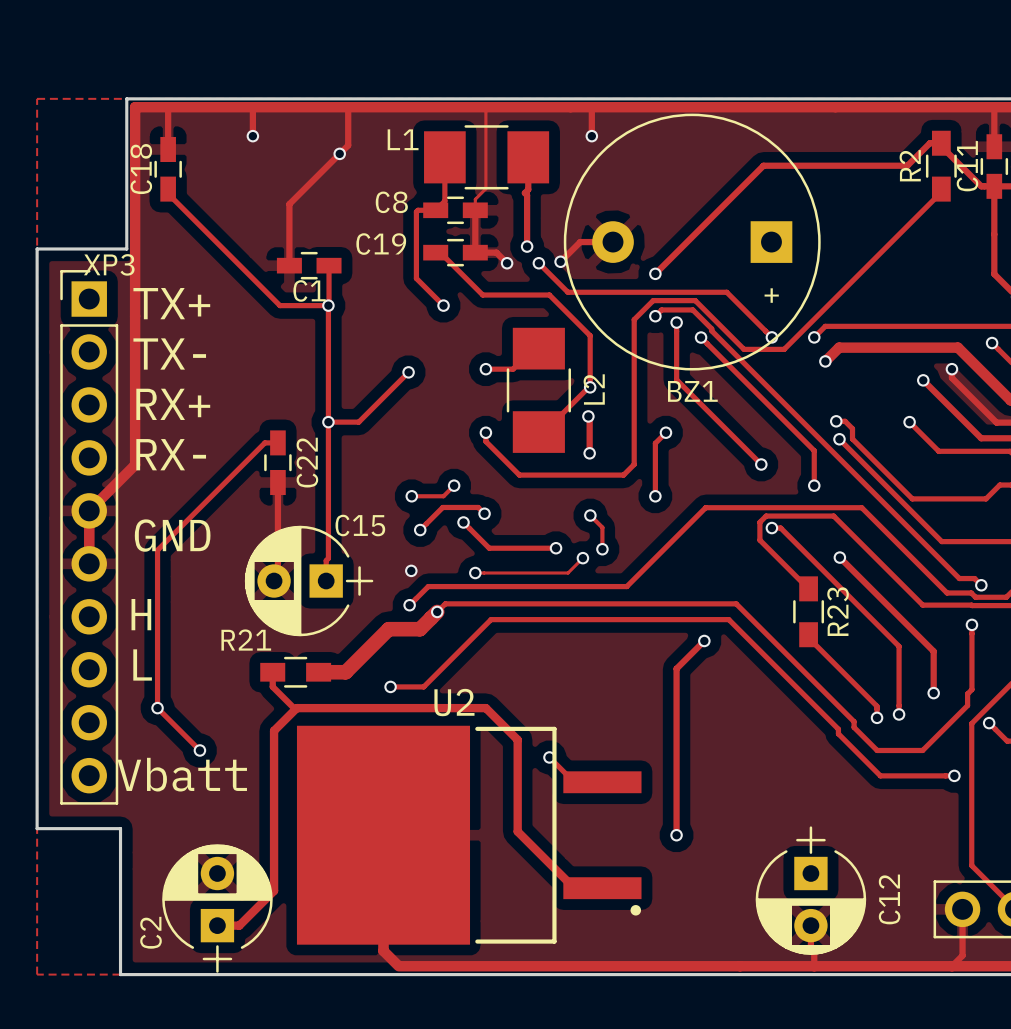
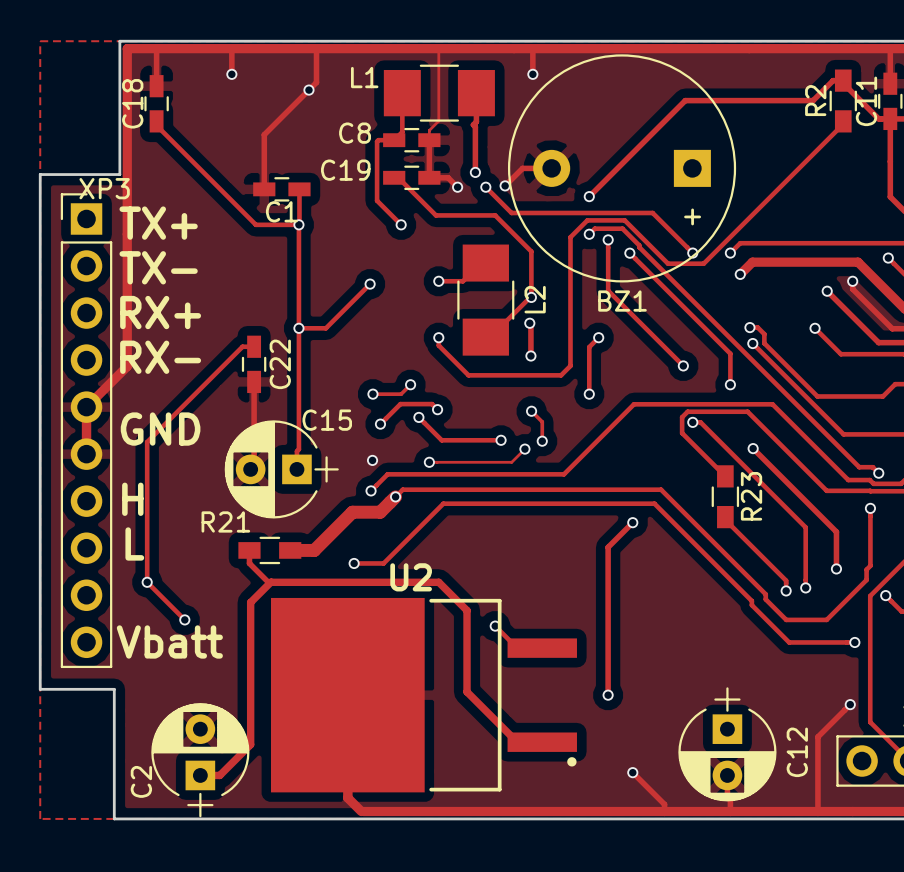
track: none -> (850, 704) (817, 736) (817, 811)
via: none -> (850, 704)
track: (962, 909) (962, 955) (951, 966) -> none
track: none -> (632, 772) (664, 804) (664, 811)
via: none -> (632, 772)

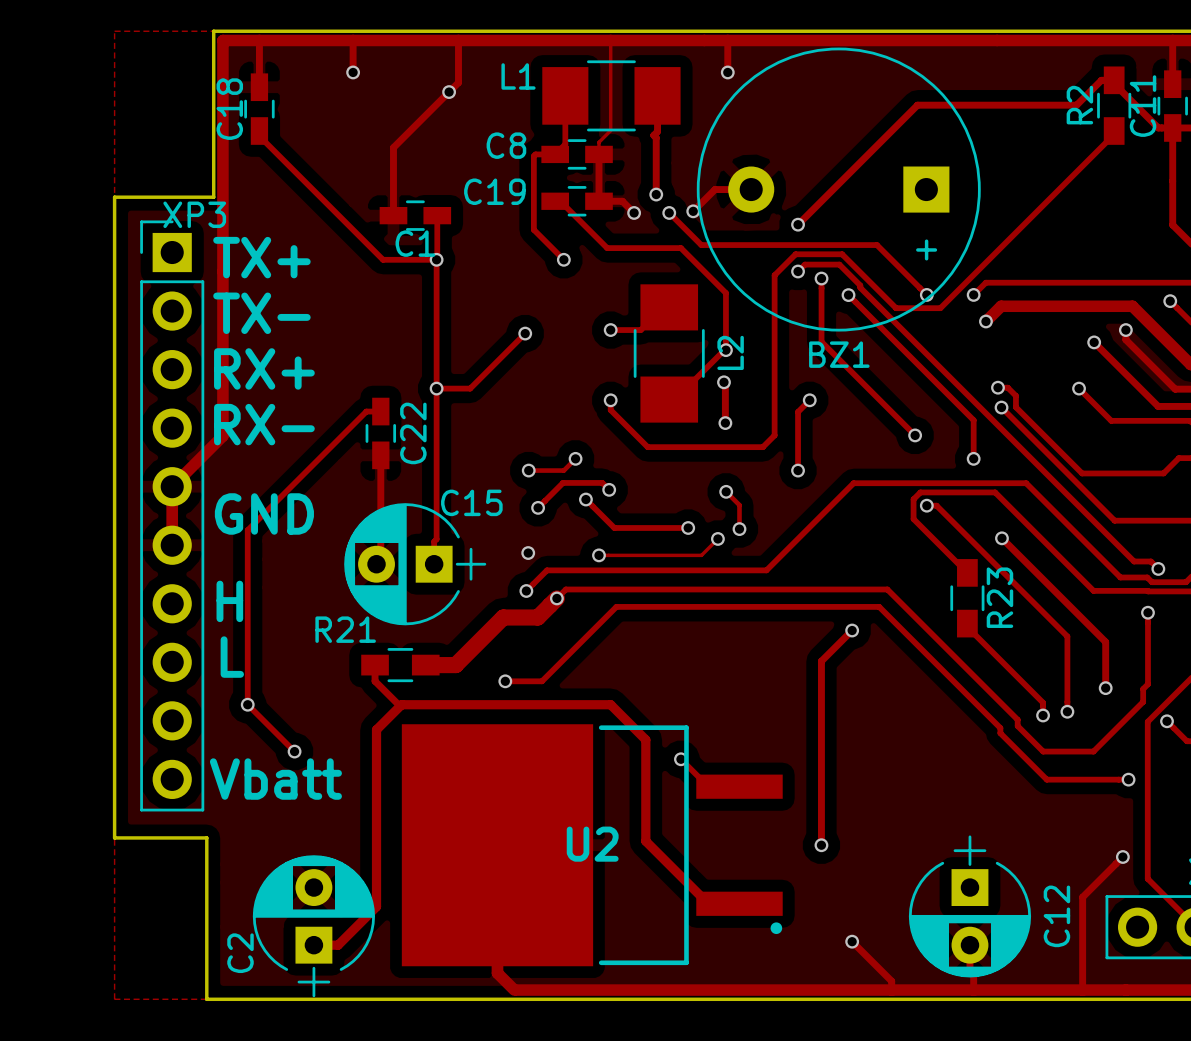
U2 name position: U2 (411, 577) -> U2 (592, 844)

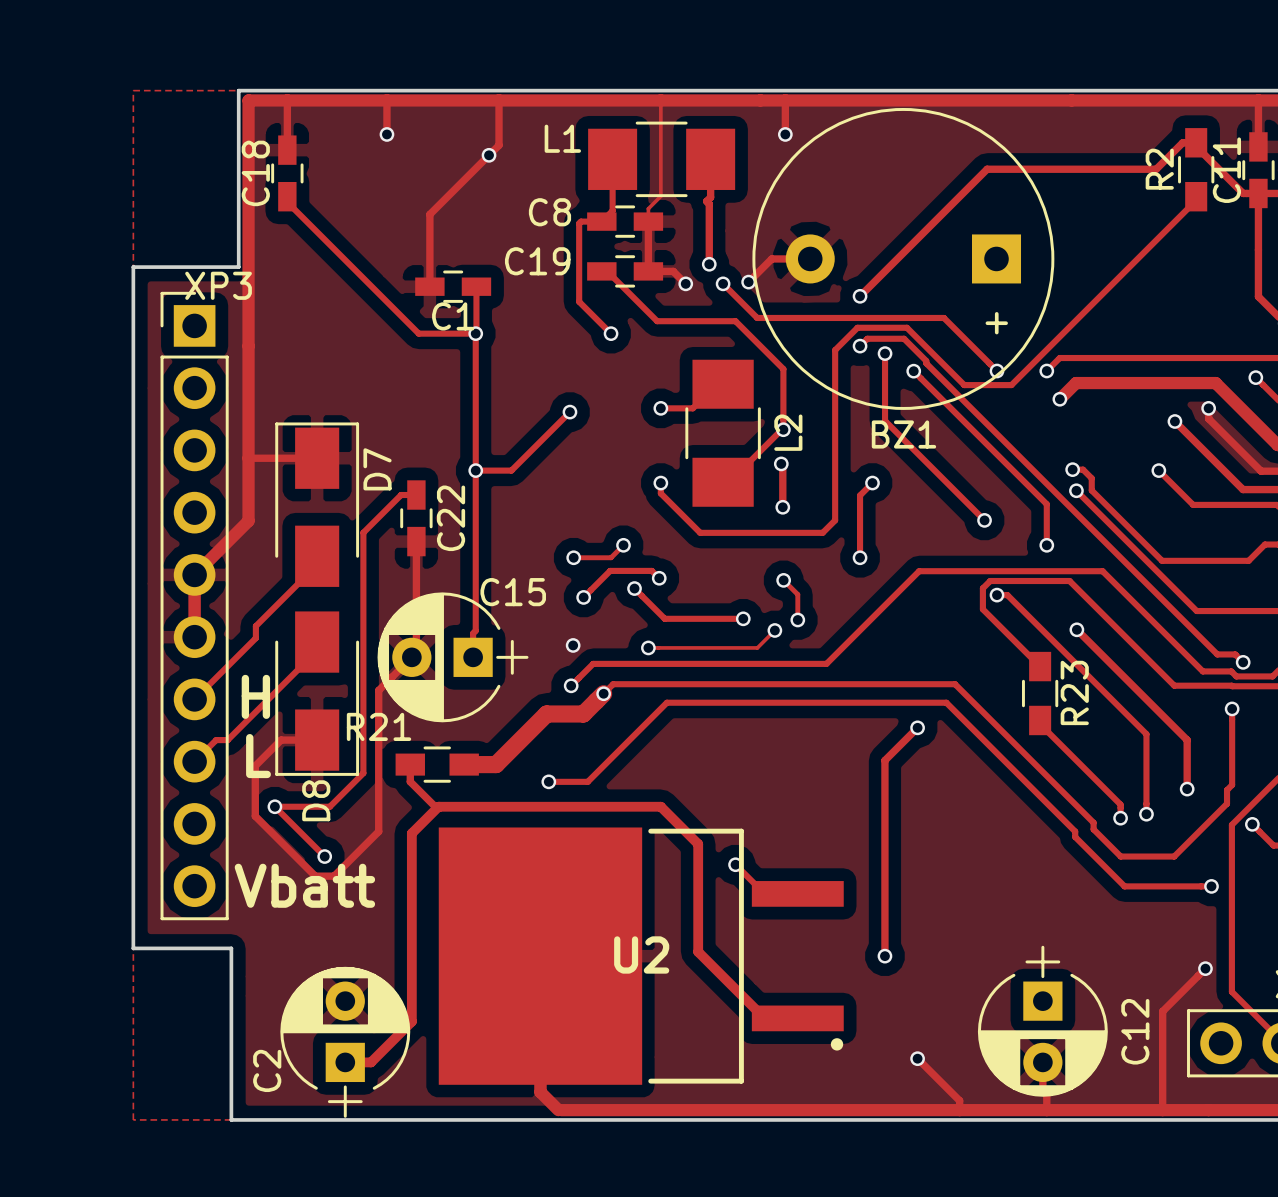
text: TX+ (261, 257) -> none
text: TX- (261, 313) -> none
text: RX+ (264, 368) -> none
track: none -> (248, 458) (317, 458)
D7: none -> (317, 504)
text: RX- (264, 424) -> none
track: (330, 447) (247, 530) (247, 704) -> (363, 532) (363, 773) (329, 806) (274, 806)
track: none -> (317, 556) (317, 564) (255, 626) (255, 638) (194, 699)
text: GND (264, 513) -> none
track: none -> (317, 642) (317, 650) (227, 740) (216, 740) (194, 761)
track: none -> (411, 657) (378, 690) (378, 831) (334, 876) (315, 876) (255, 816) (255, 765) (281, 740) (317, 740)
D8: none -> (317, 693)

